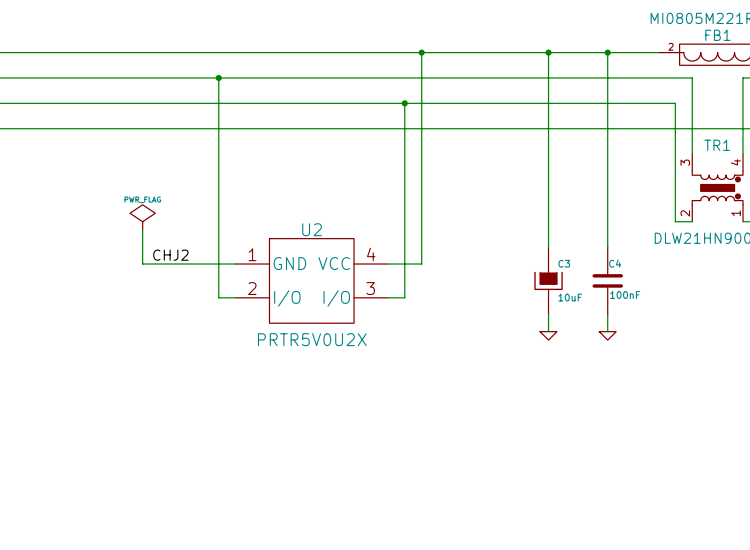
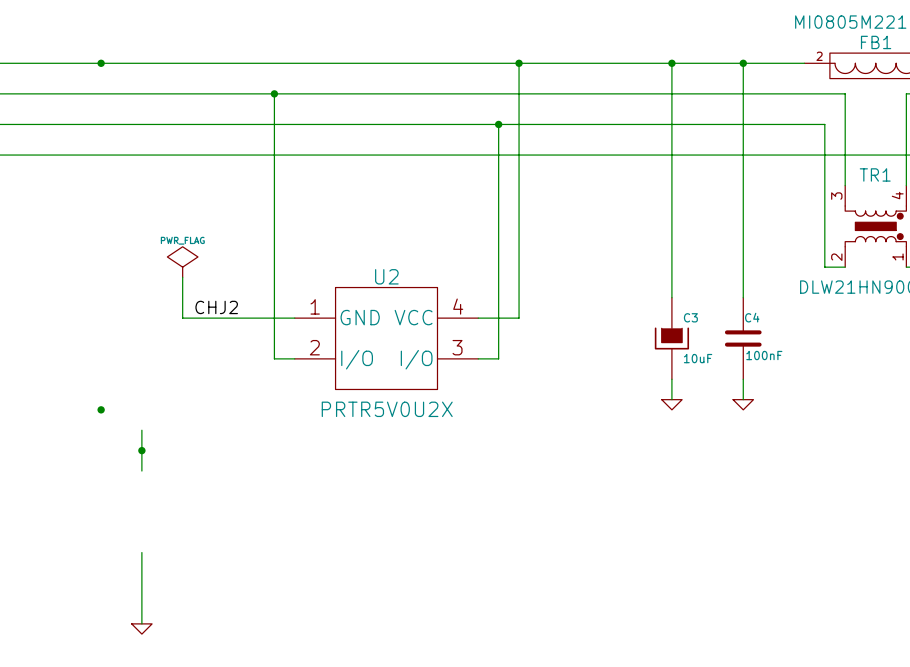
junction: none -> (101, 63)
junction: none -> (101, 409)
wire: none -> (141, 430) (141, 471)
junction: none -> (141, 450)
wire: none -> (141, 552) (141, 623)
power symbol: none -> (141, 629)

